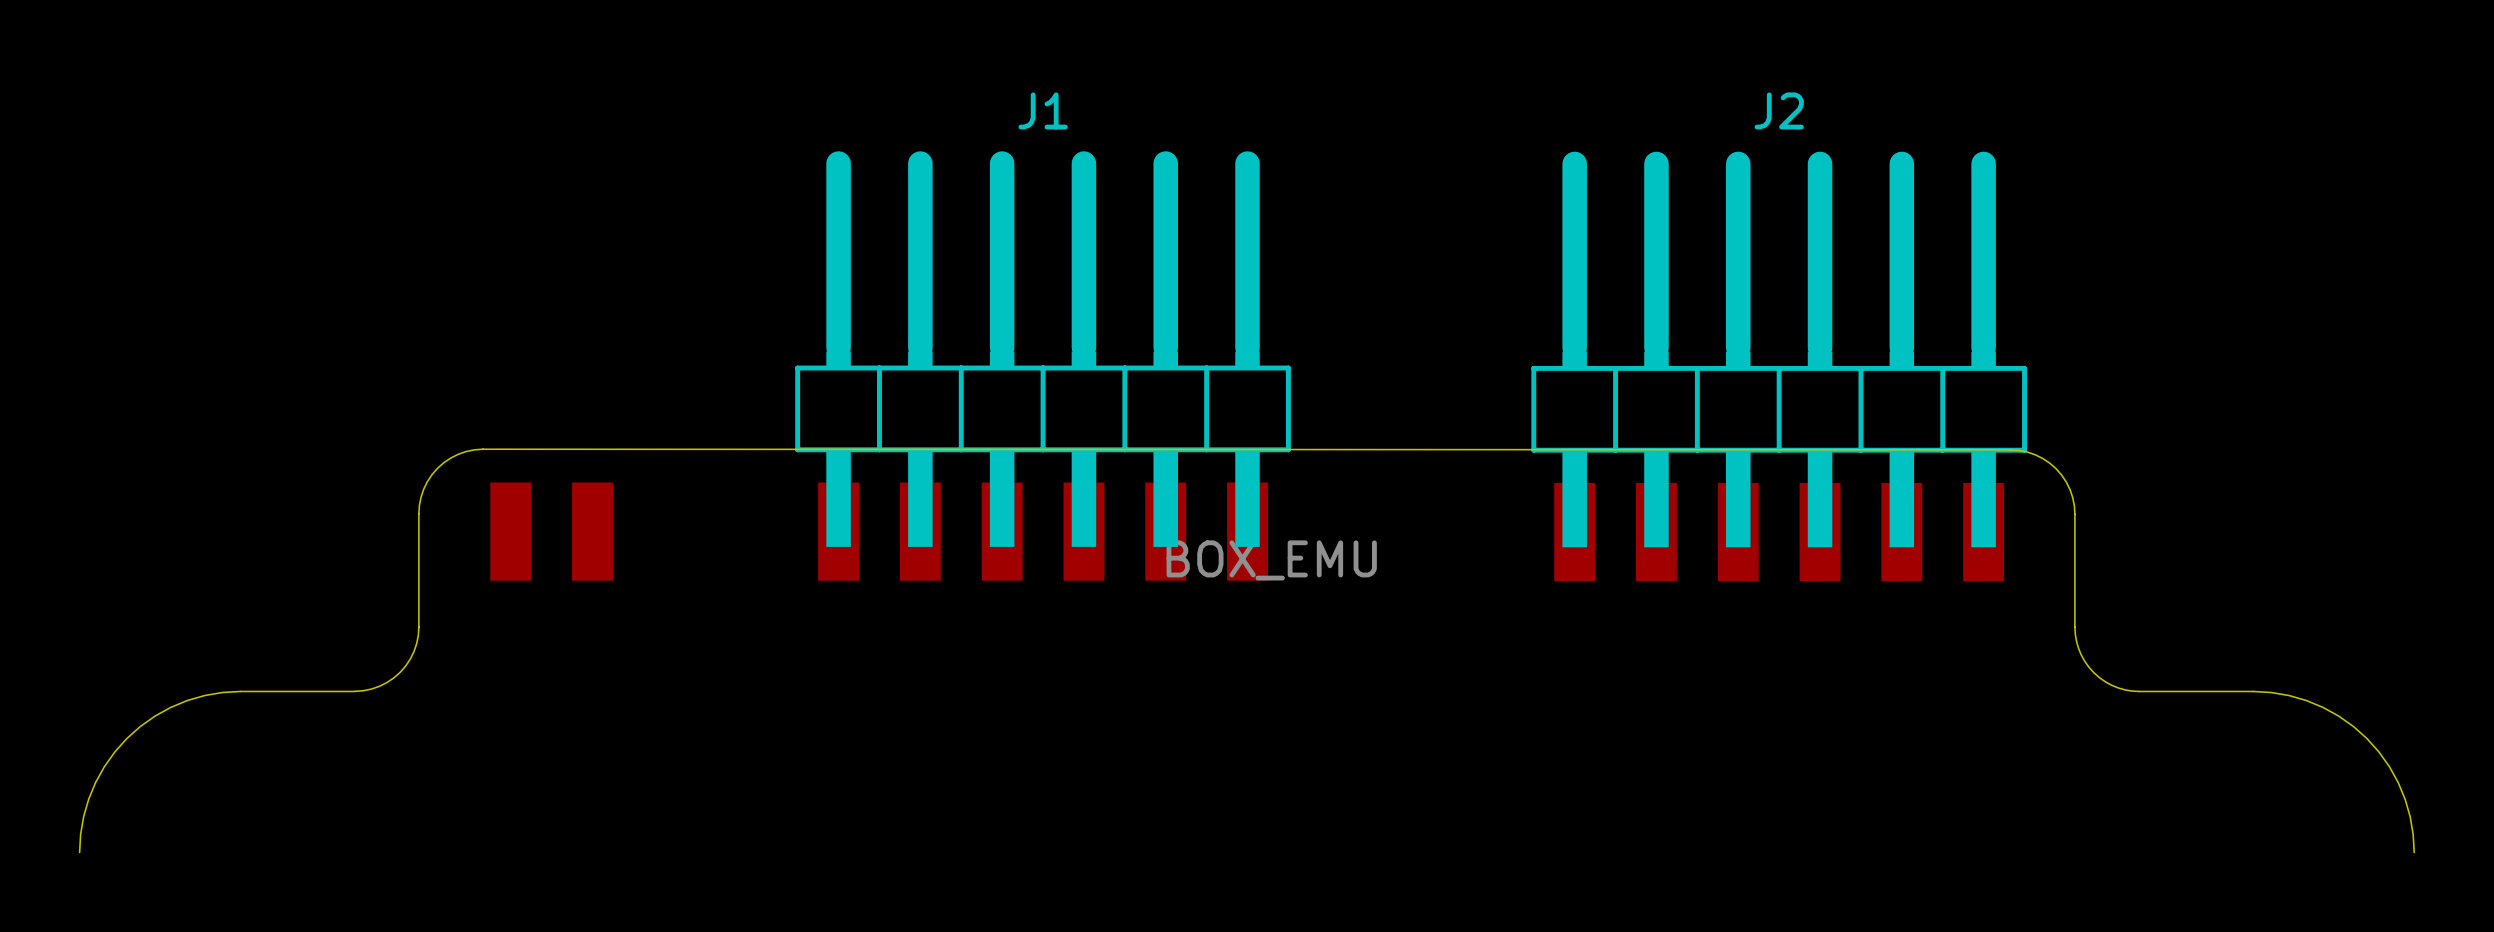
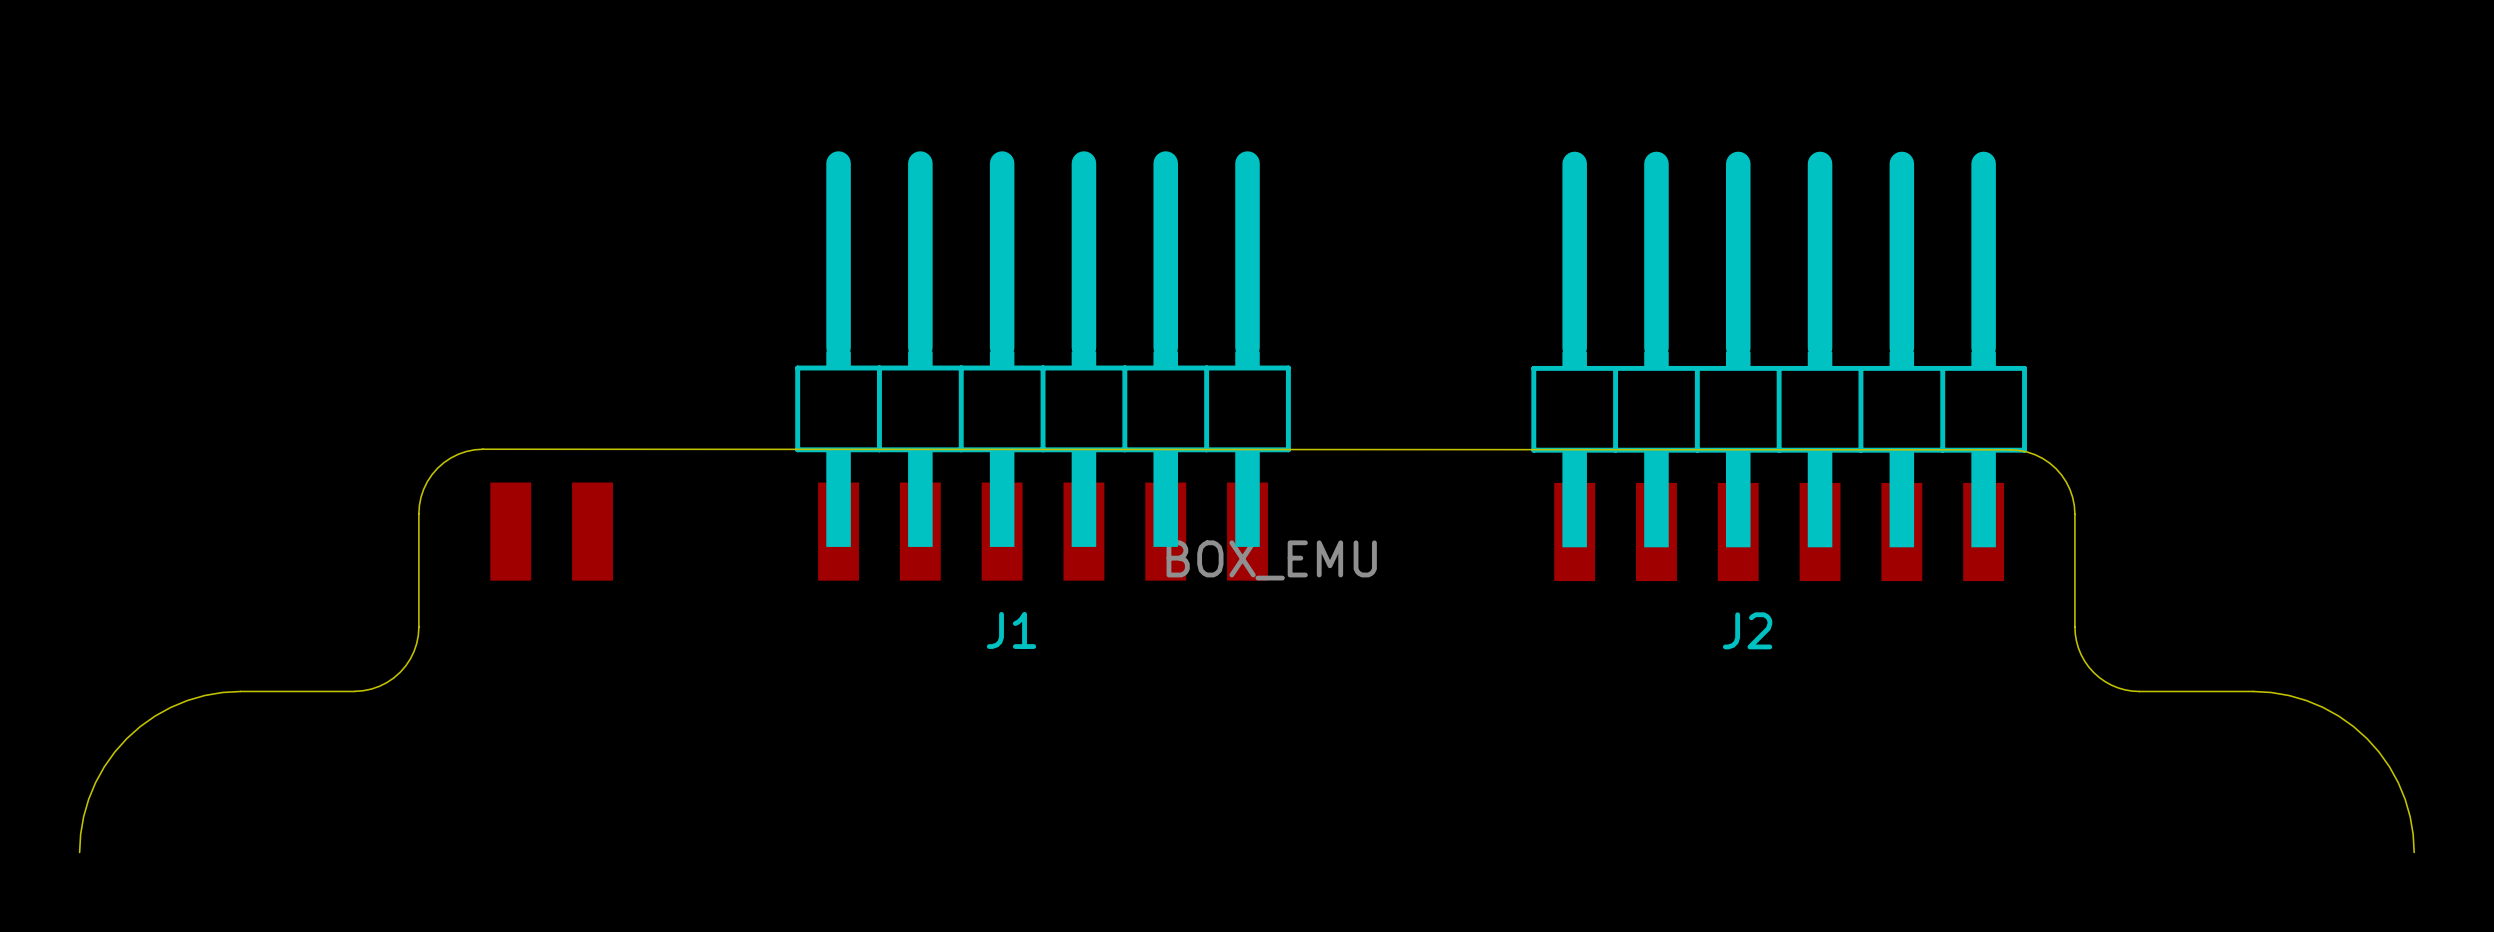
J1 name position: J1 (1043, 110) -> J1 (1011, 630)
J2 name position: J2 (1779, 110) -> J2 (1747, 630)

